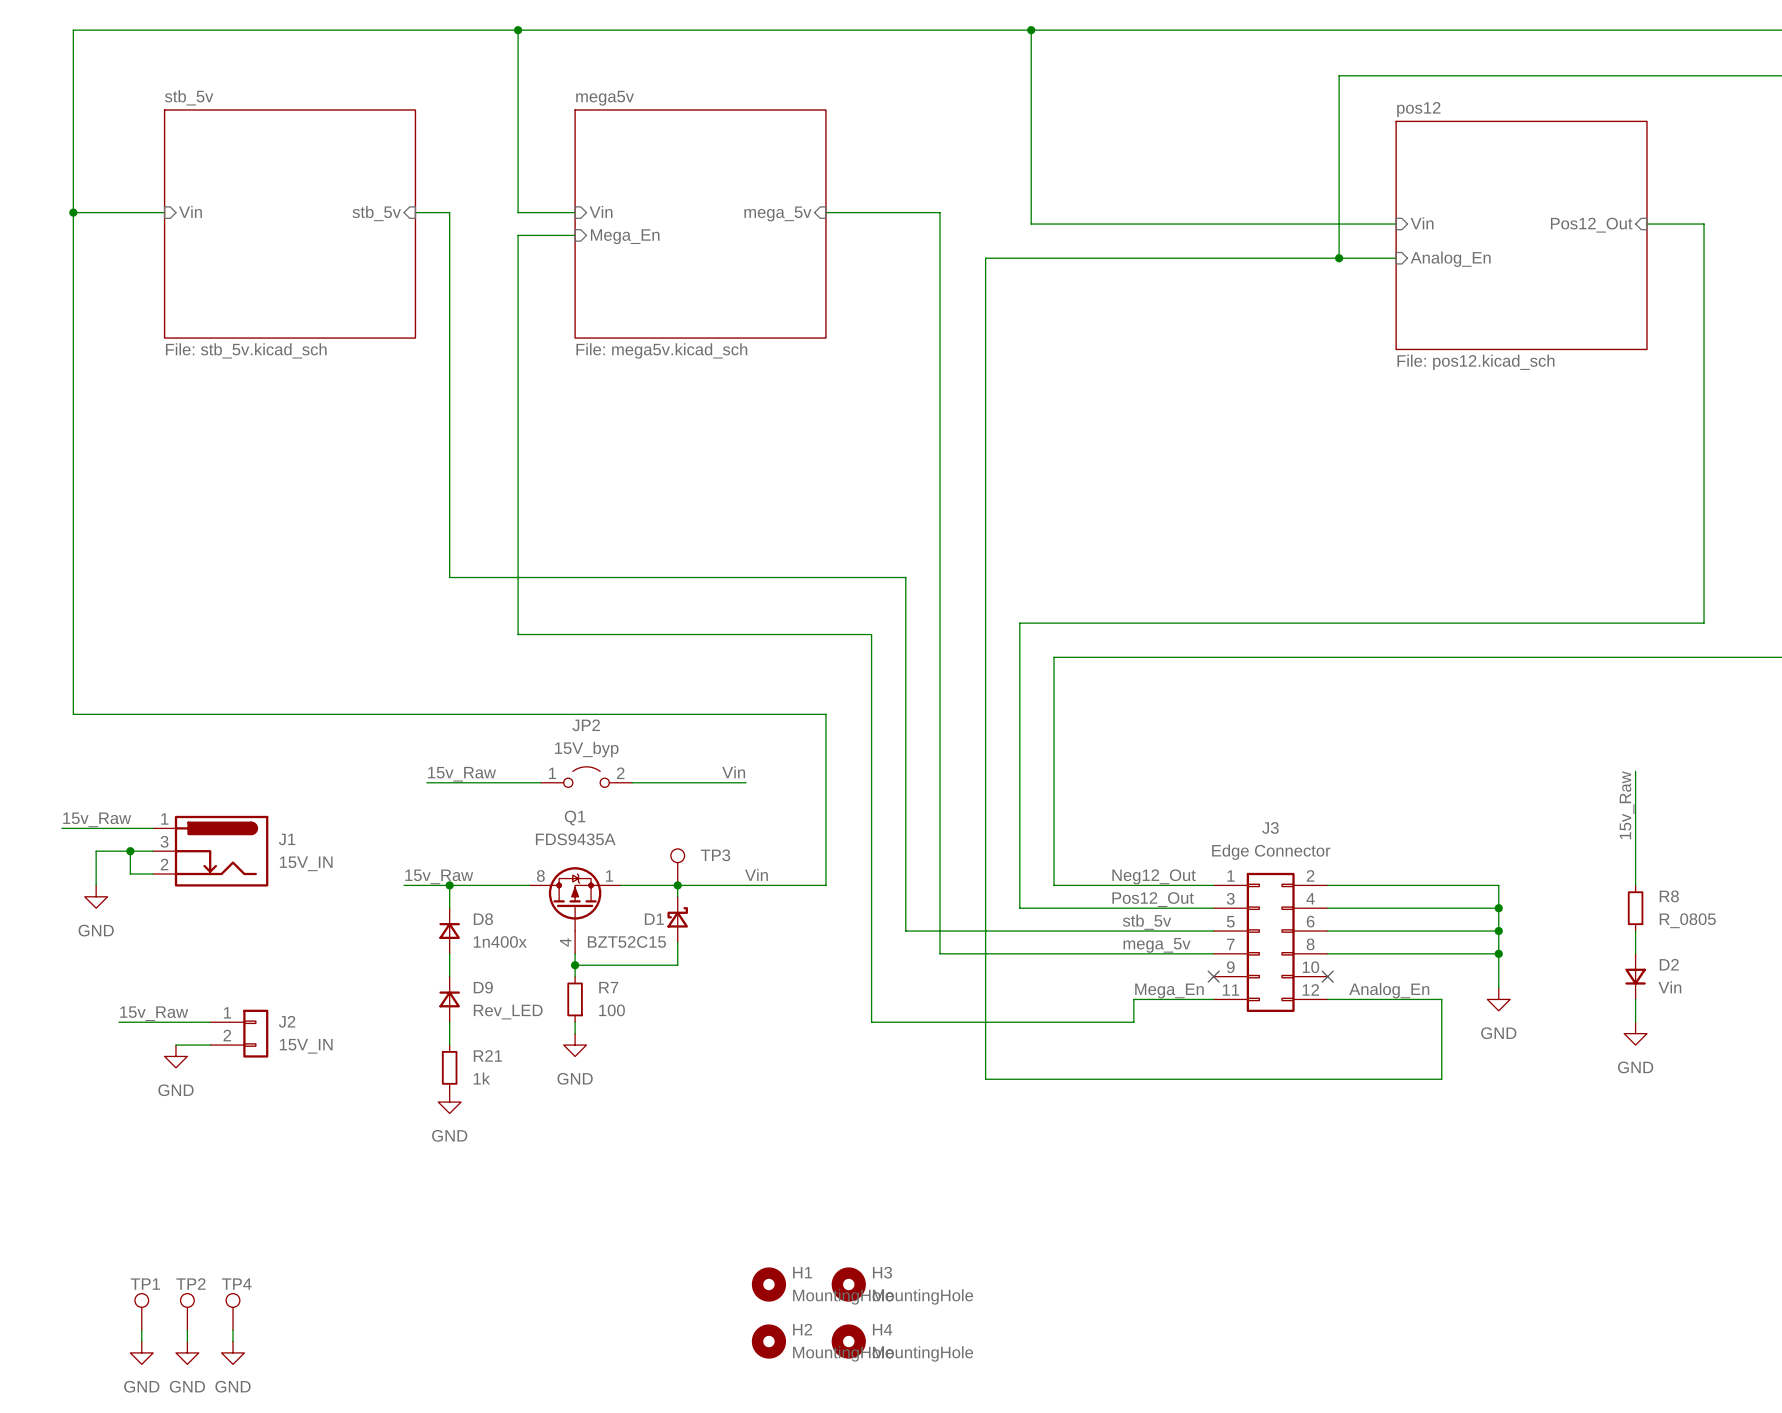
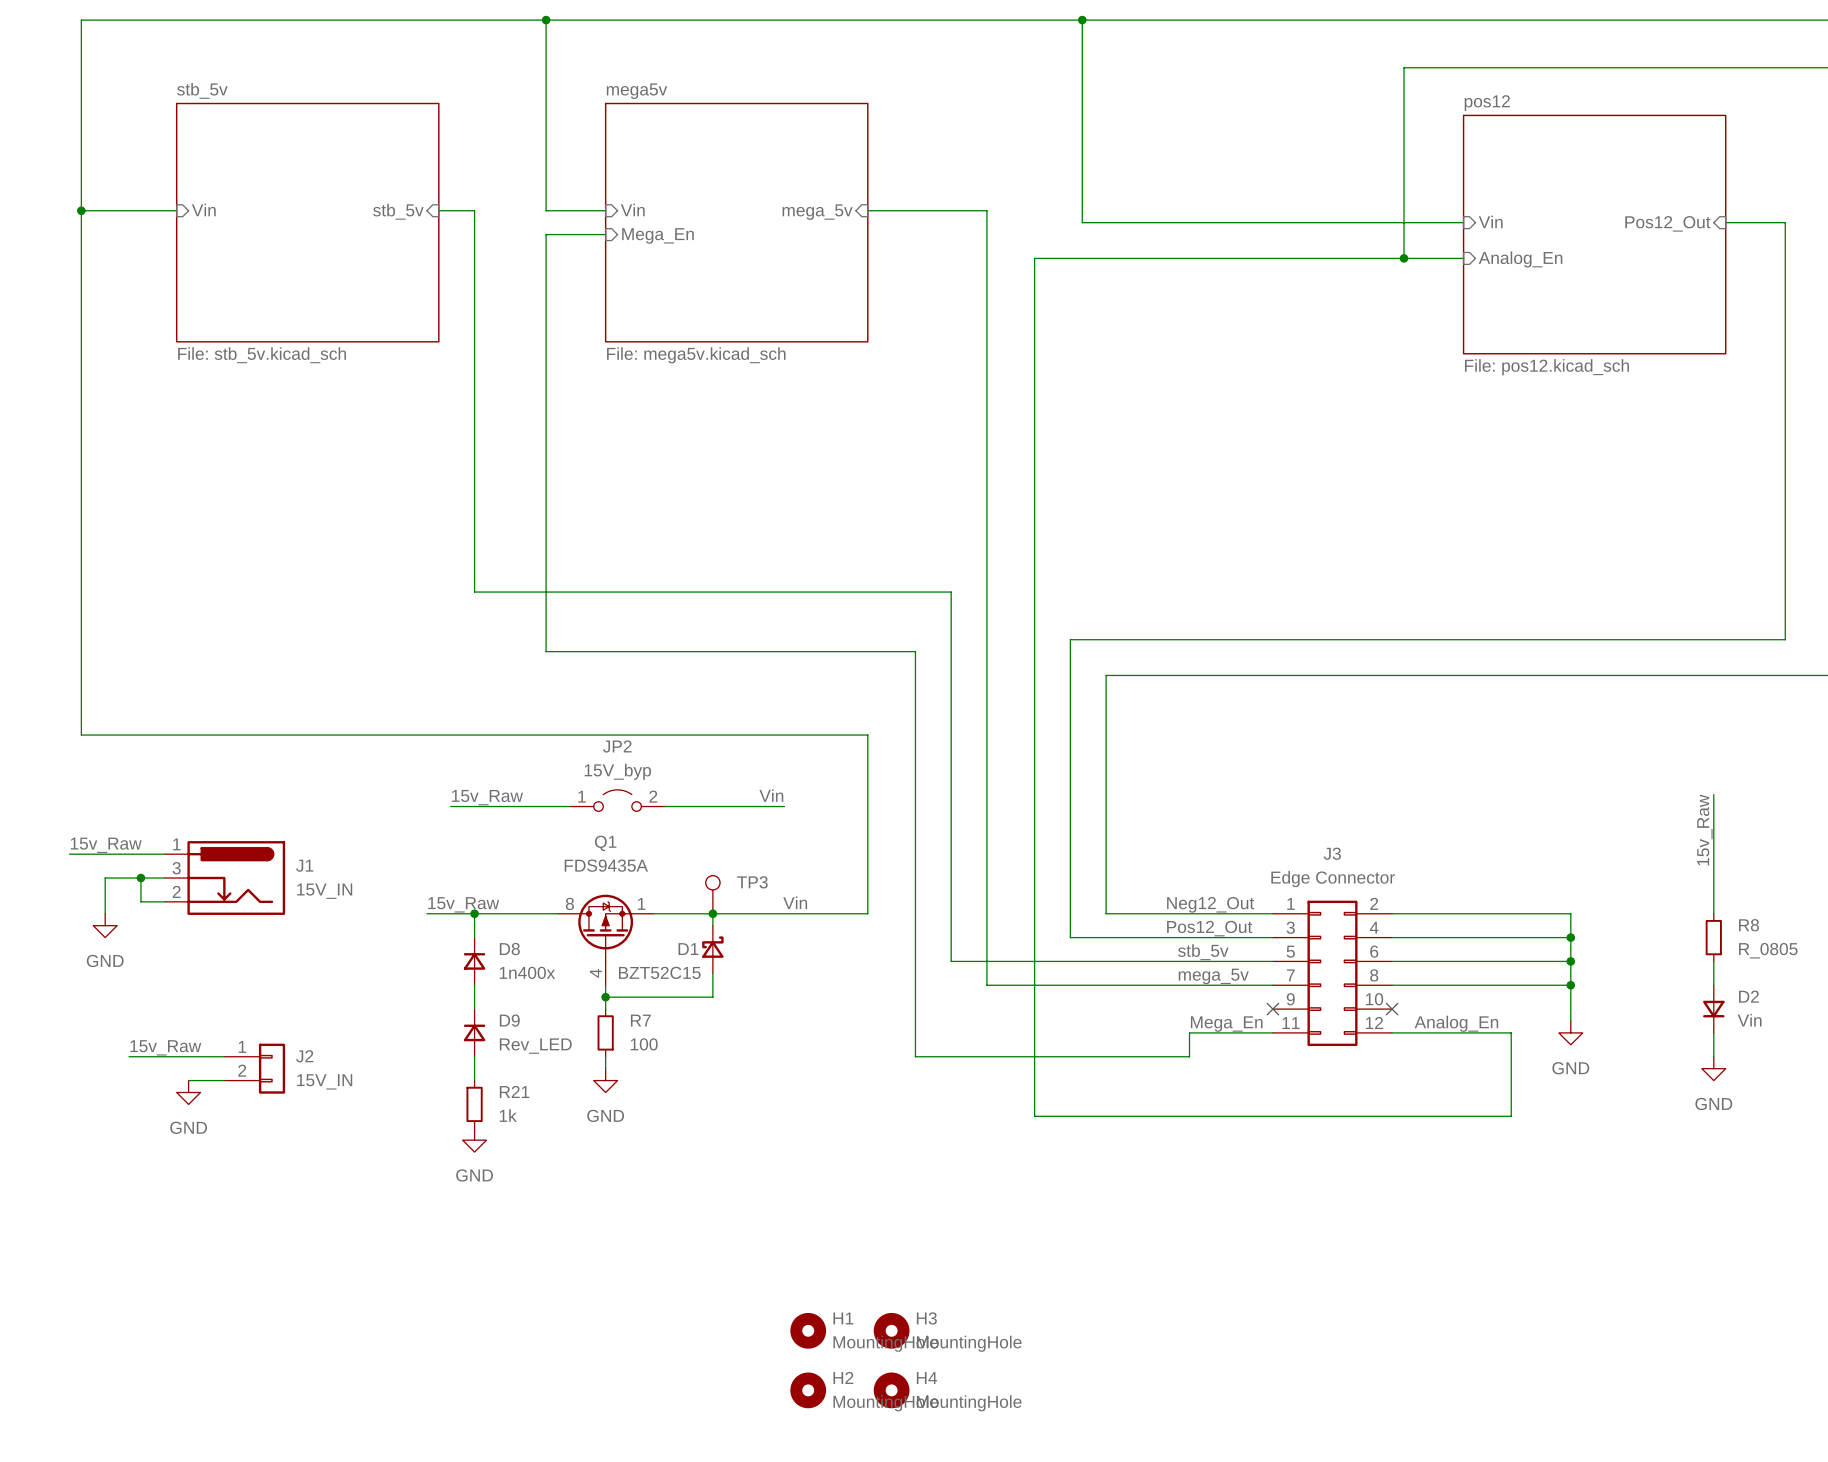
TP1: (141, 1311) -> none
TP2: (187, 1311) -> none
TP4: (232, 1311) -> none
wire: (141, 1330) (141, 1341) -> none
wire: (187, 1330) (187, 1341) -> none
wire: (232, 1330) (232, 1341) -> none
power symbol: GND (141, 1352) -> none
power symbol: GND (187, 1352) -> none
power symbol: GND (232, 1352) -> none

